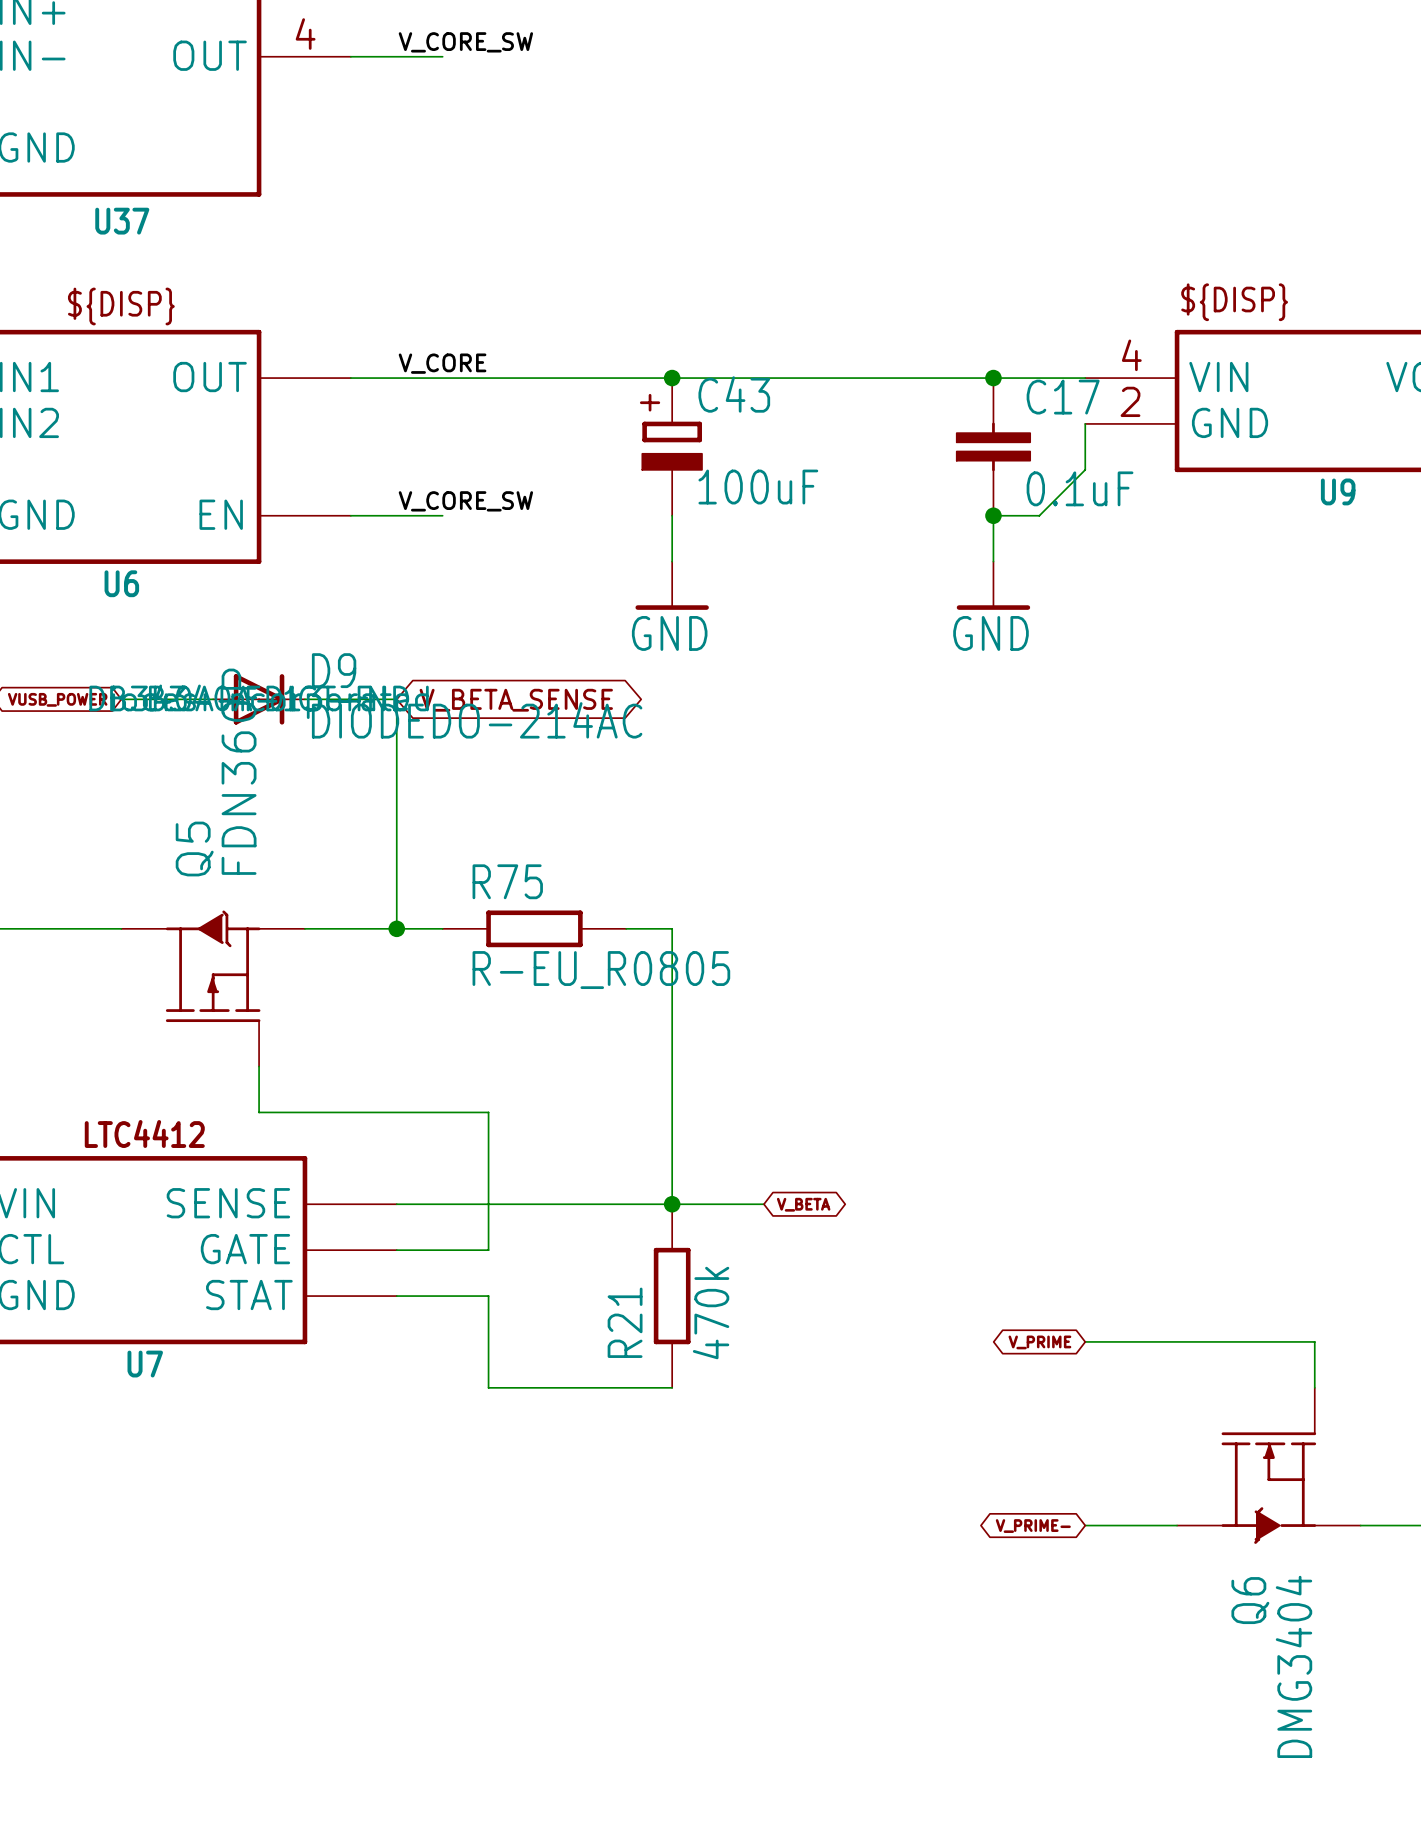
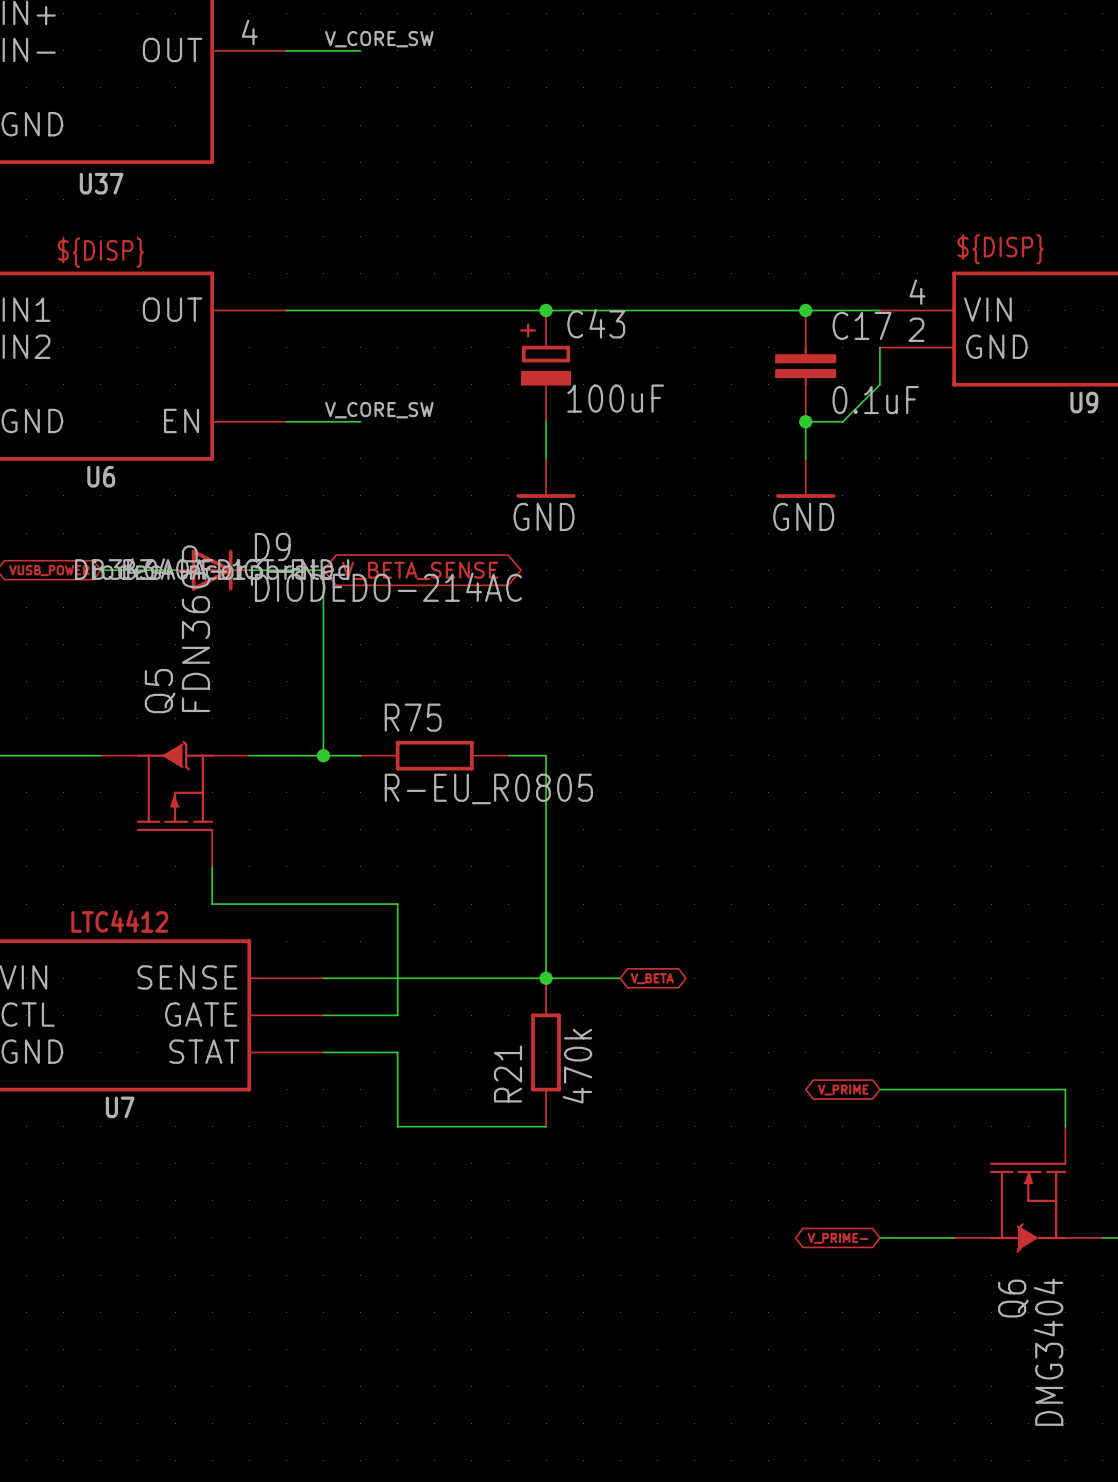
label: V_CORE (442, 363) -> none

